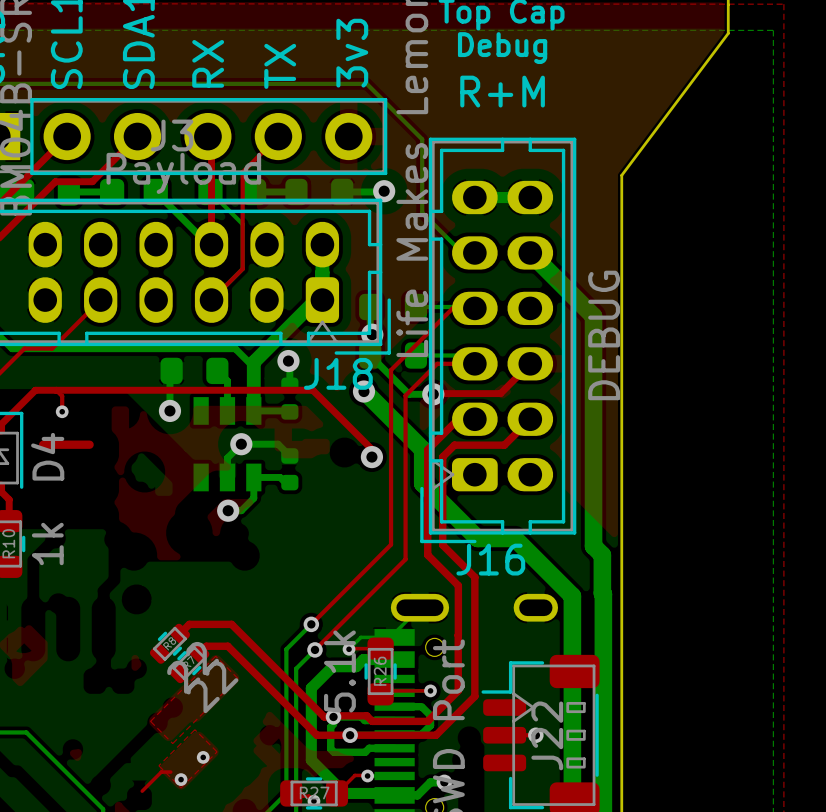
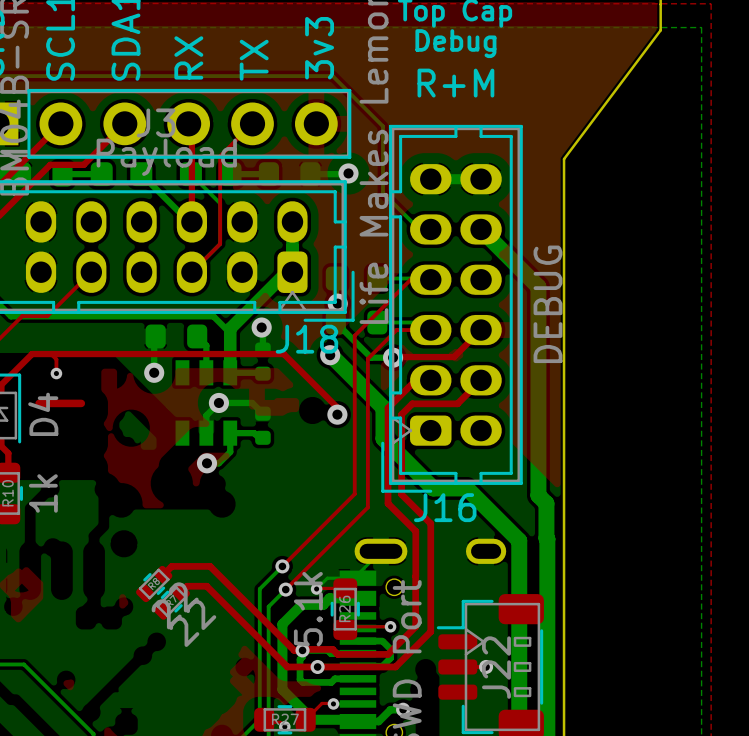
top zone outline: (215, 656) (150, 721) (172, 743) (237, 678) (215, 656) -> none
top zone outline: (194, 729) (158, 765) (181, 787) (217, 751) (194, 729) -> none
via: (203, 757) -> none
top track: (170, 772) (161, 772) (142, 791) -> none
via: (181, 779) -> none

